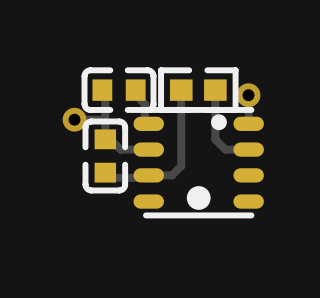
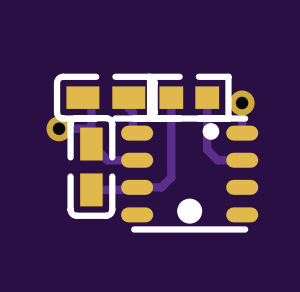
part footprint: [81, 67, 157, 113] -> [53, 73, 158, 122]
part footprint: [82, 118, 129, 194] -> [67, 115, 116, 219]

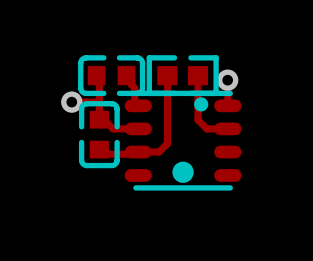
part footprint: [53, 73, 158, 122] -> [78, 55, 146, 97]
part footprint: [67, 115, 116, 219] -> [78, 101, 120, 169]

